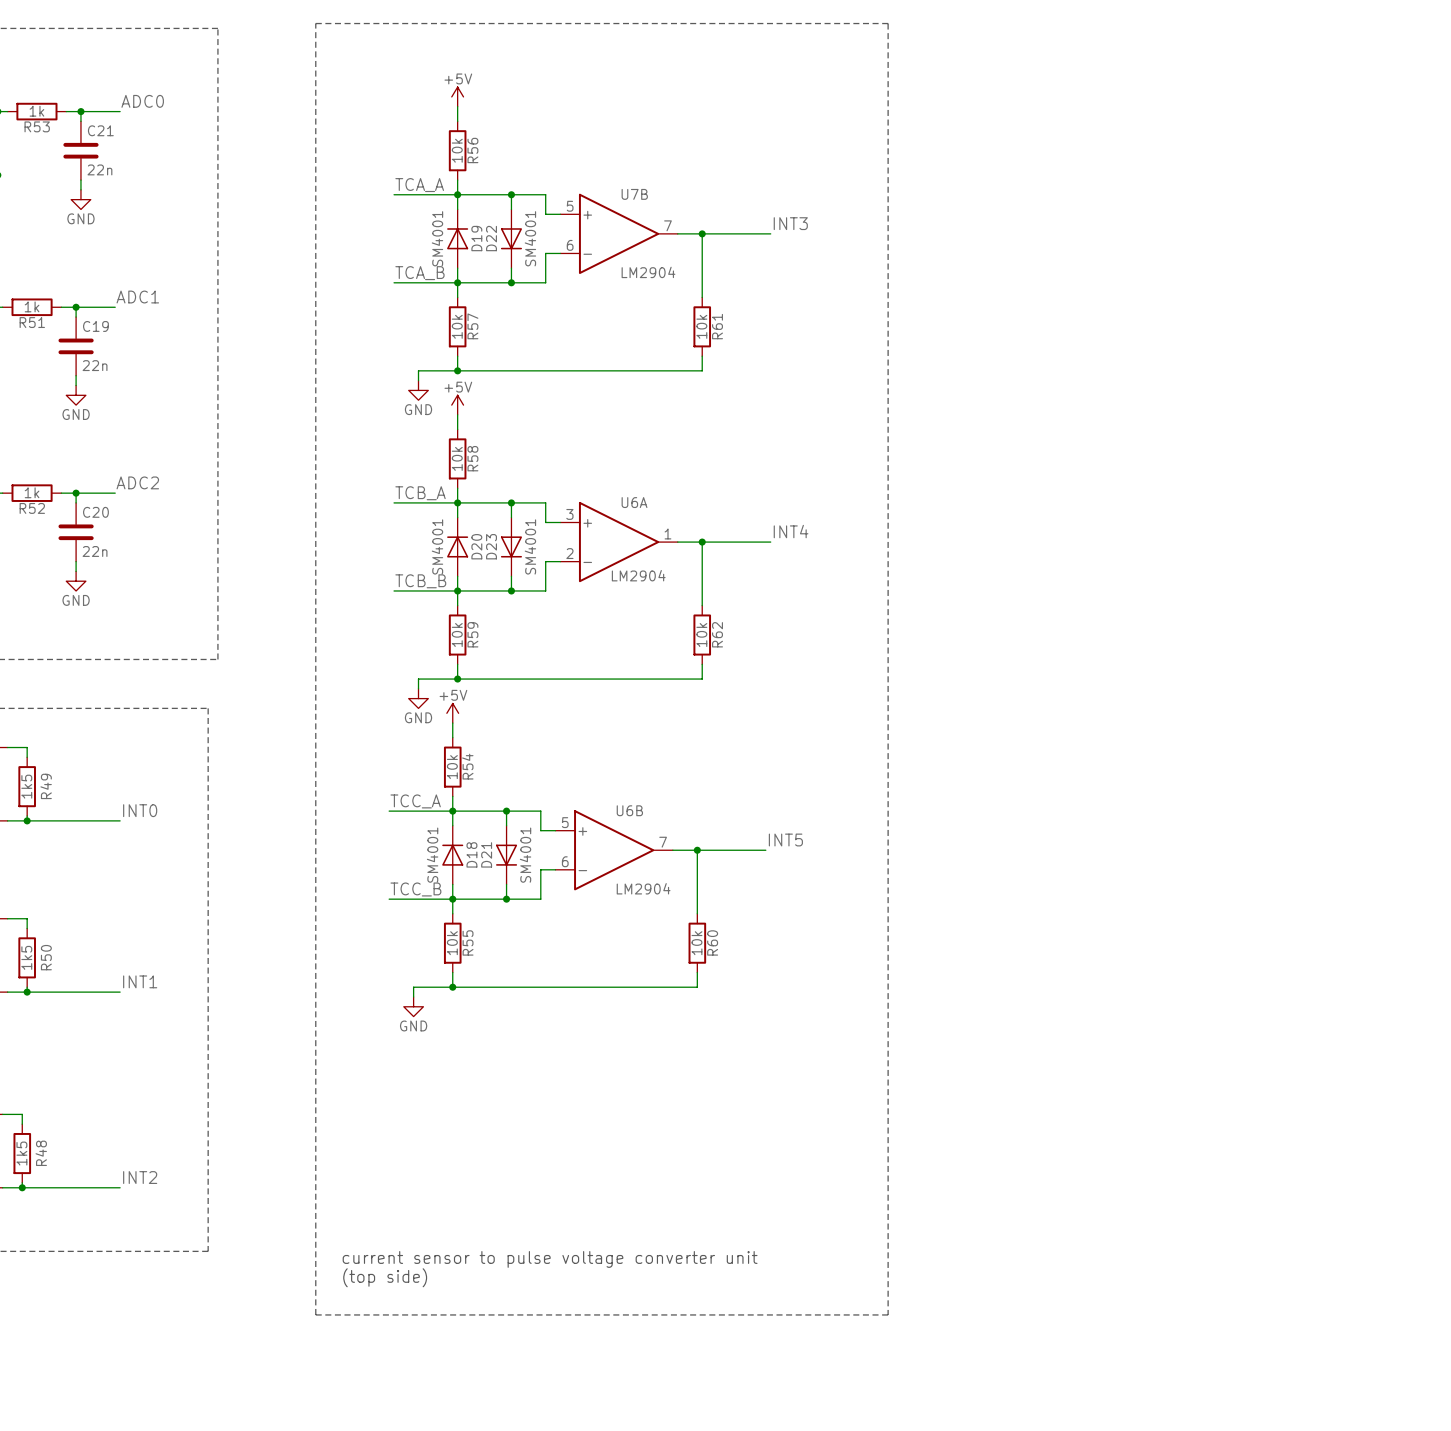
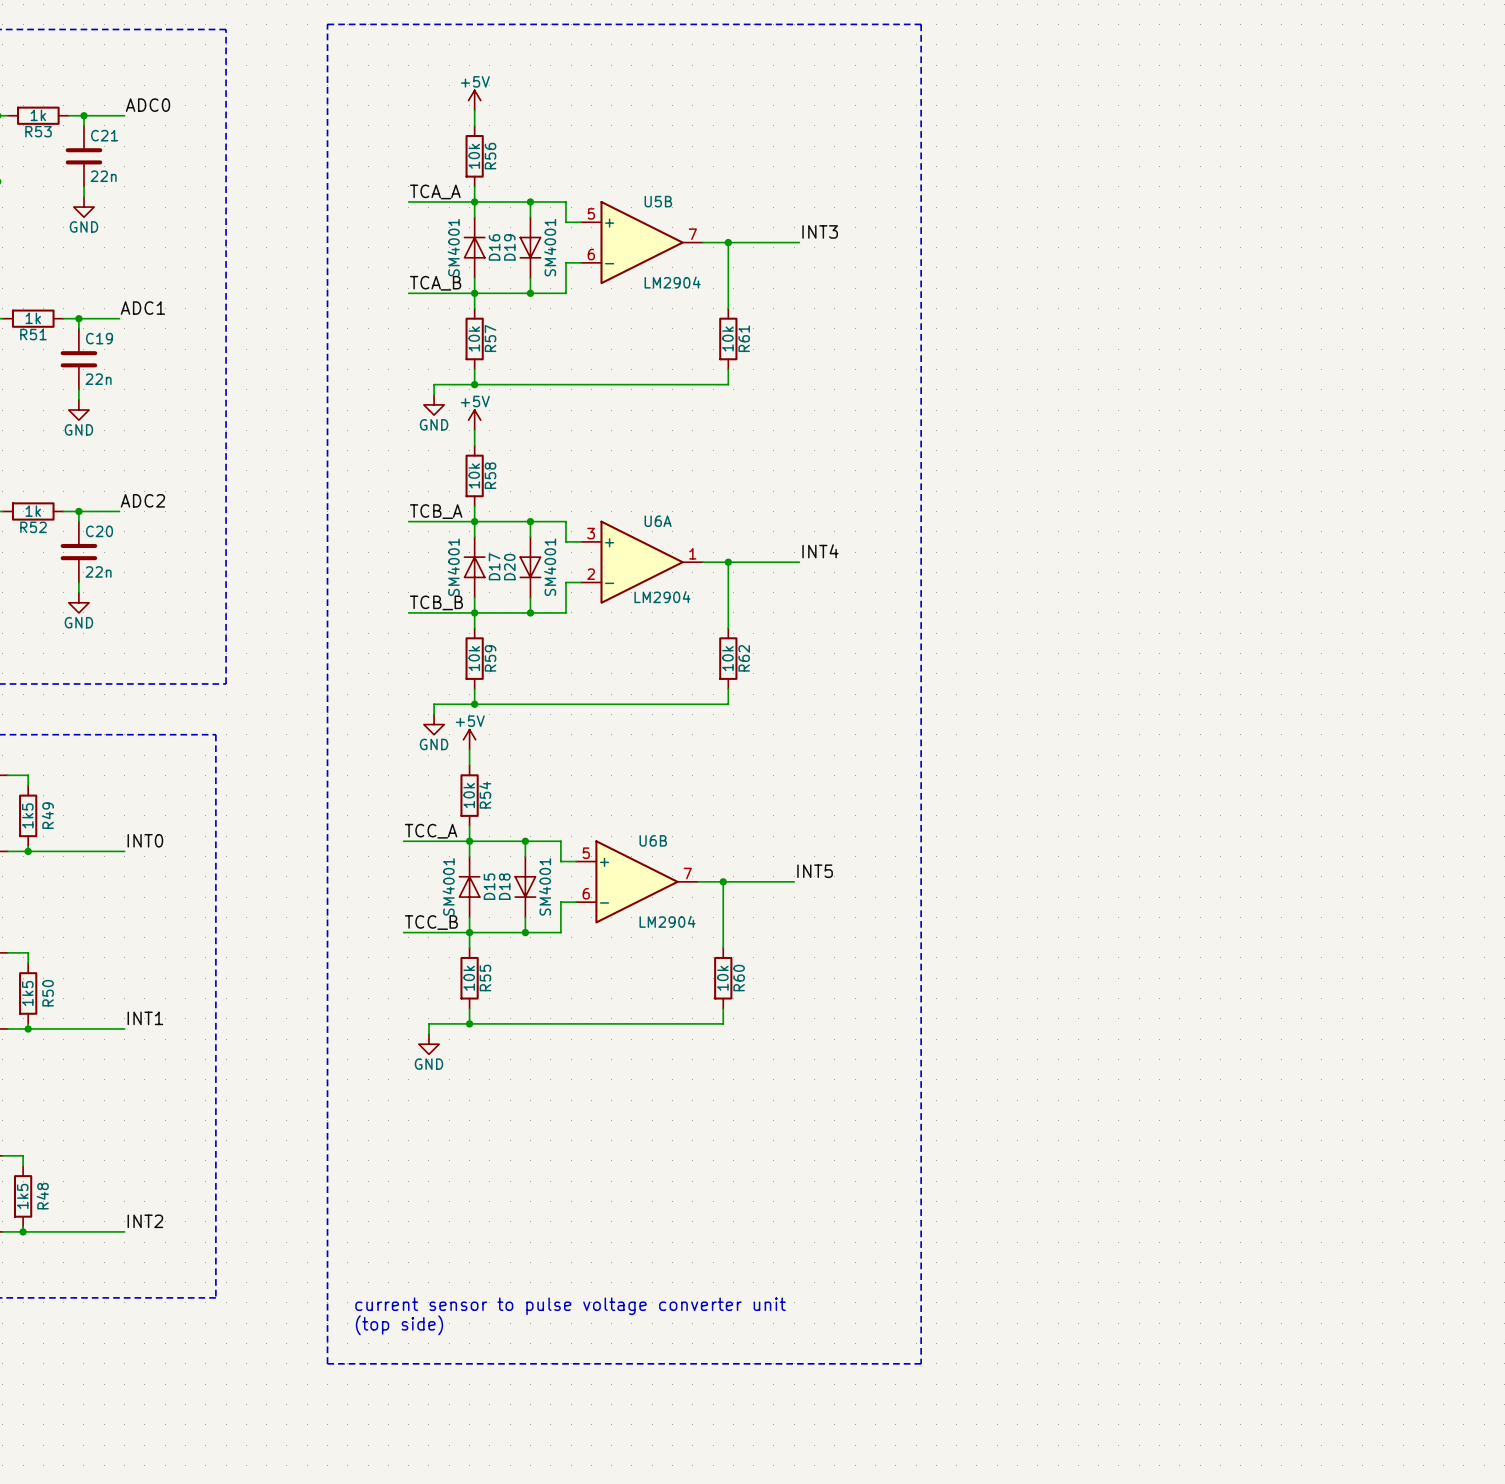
U7B name: U7B (634, 194) -> U5B (658, 201)
D19 name: D19 (476, 238) -> D16 (494, 247)
D22 name: D22 (491, 238) -> D19 (509, 247)
D20 name: D20 (476, 546) -> D17 (494, 566)
D23 name: D23 (491, 546) -> D20 (509, 567)
D18 name: D18 (471, 854) -> D15 (489, 886)
D21 name: D21 (486, 854) -> D18 (504, 886)

